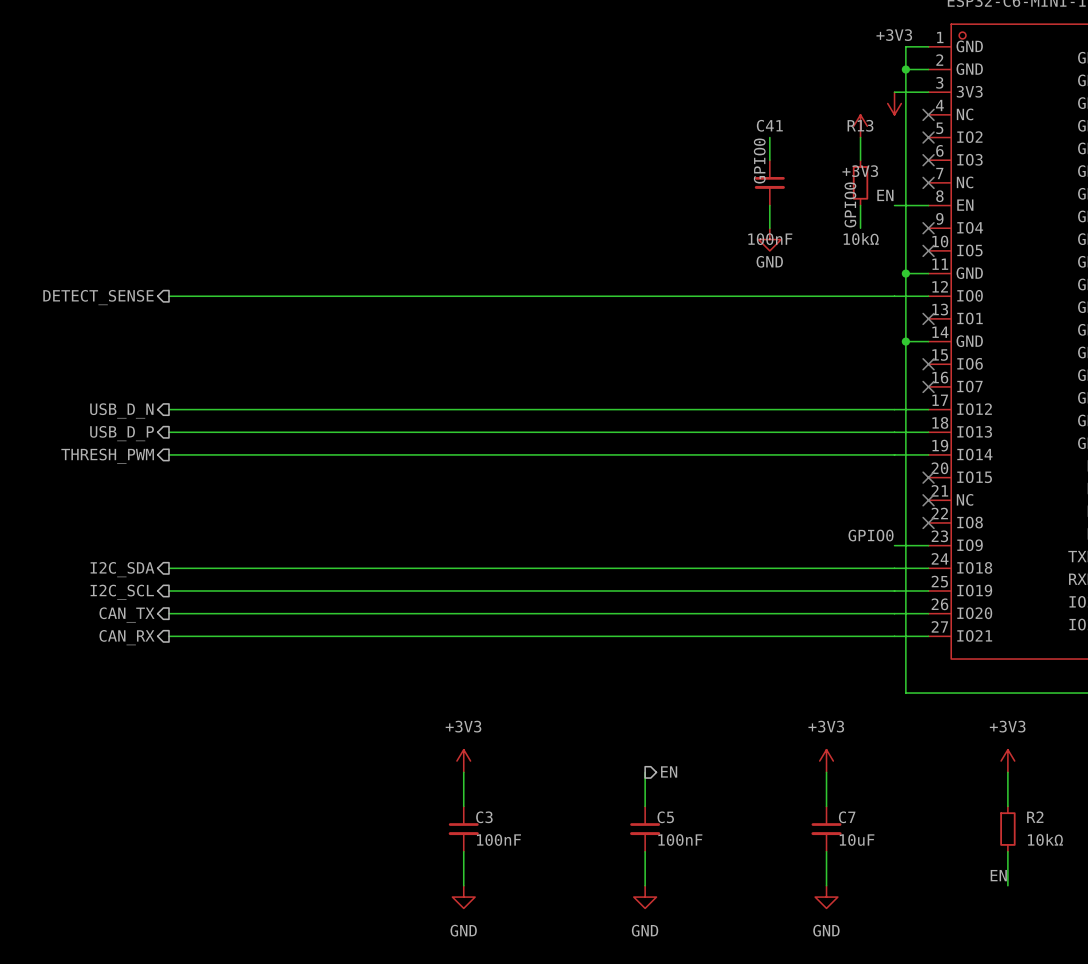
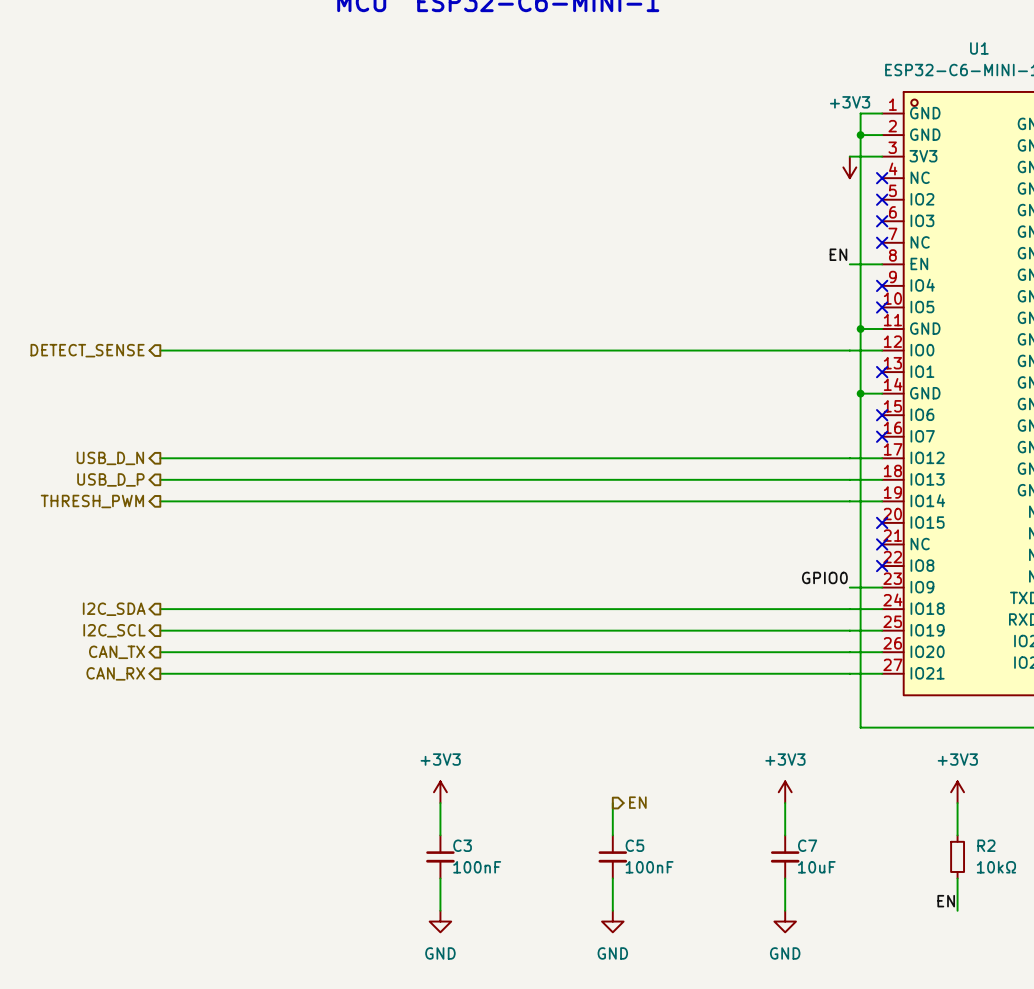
power symbol: +3V3 (860, 126) -> none
wire: (769, 137) (769, 160) -> none
wire: (860, 137) (860, 160) -> none
label: GPIO0 (759, 161) -> none
C41: 100nF (769, 182) -> none
R13: 10kΩ (860, 182) -> none
label: GPIO0 (850, 204) -> none
wire: (769, 205) (769, 228) -> none
wire: (860, 205) (860, 228) -> none
power symbol: GND (769, 239) -> none

